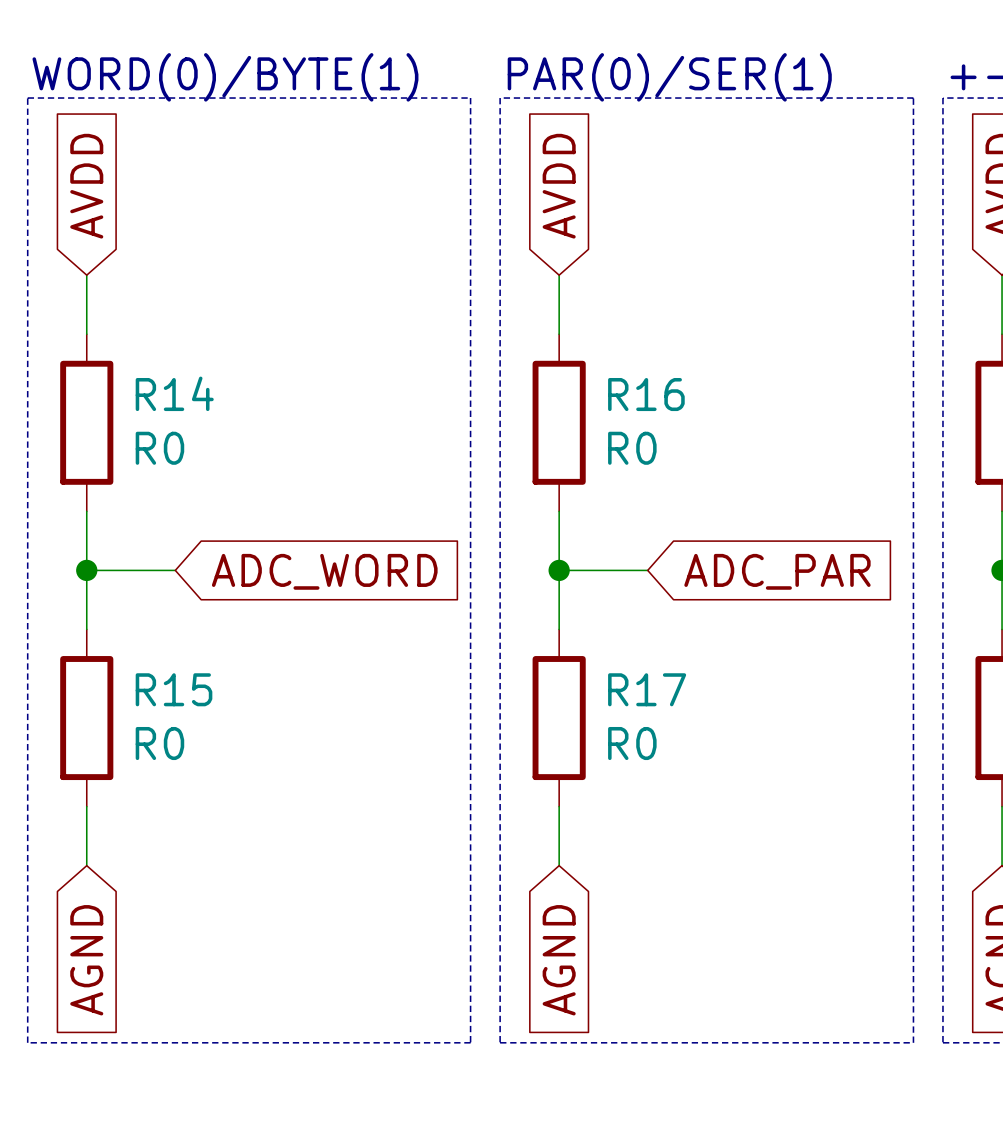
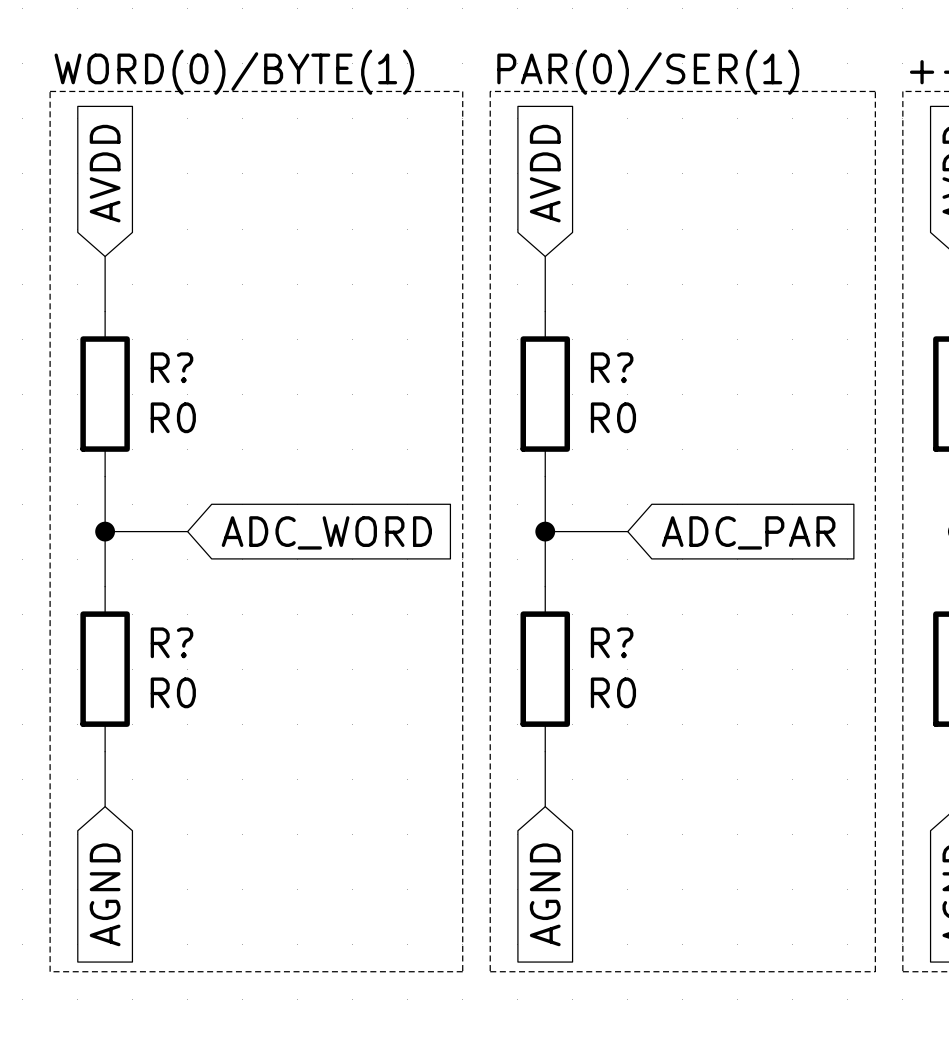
R14 name: R14 (174, 393) -> R? (172, 367)
R16 name: R16 (646, 394) -> R? (612, 367)
R15 name: R15 (174, 689) -> R? (172, 642)
R17 name: R17 (647, 689) -> R? (612, 642)

